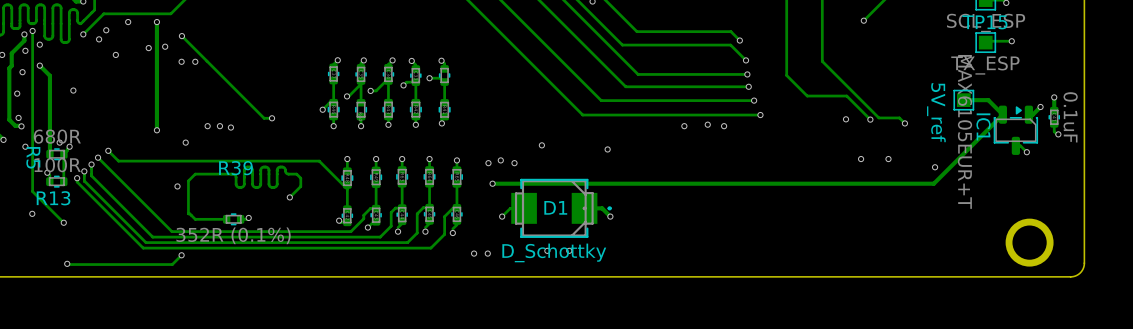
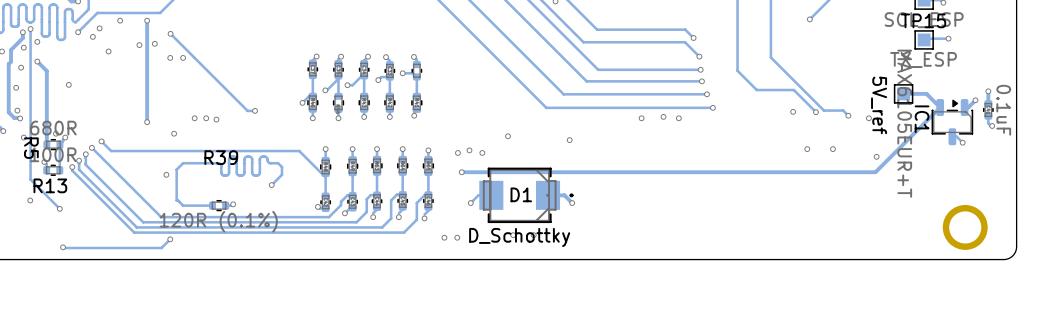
via: none -> (868, 118)
R39 value: 352R (0.1%) (233, 235) -> 120R (0.1%) (218, 221)

